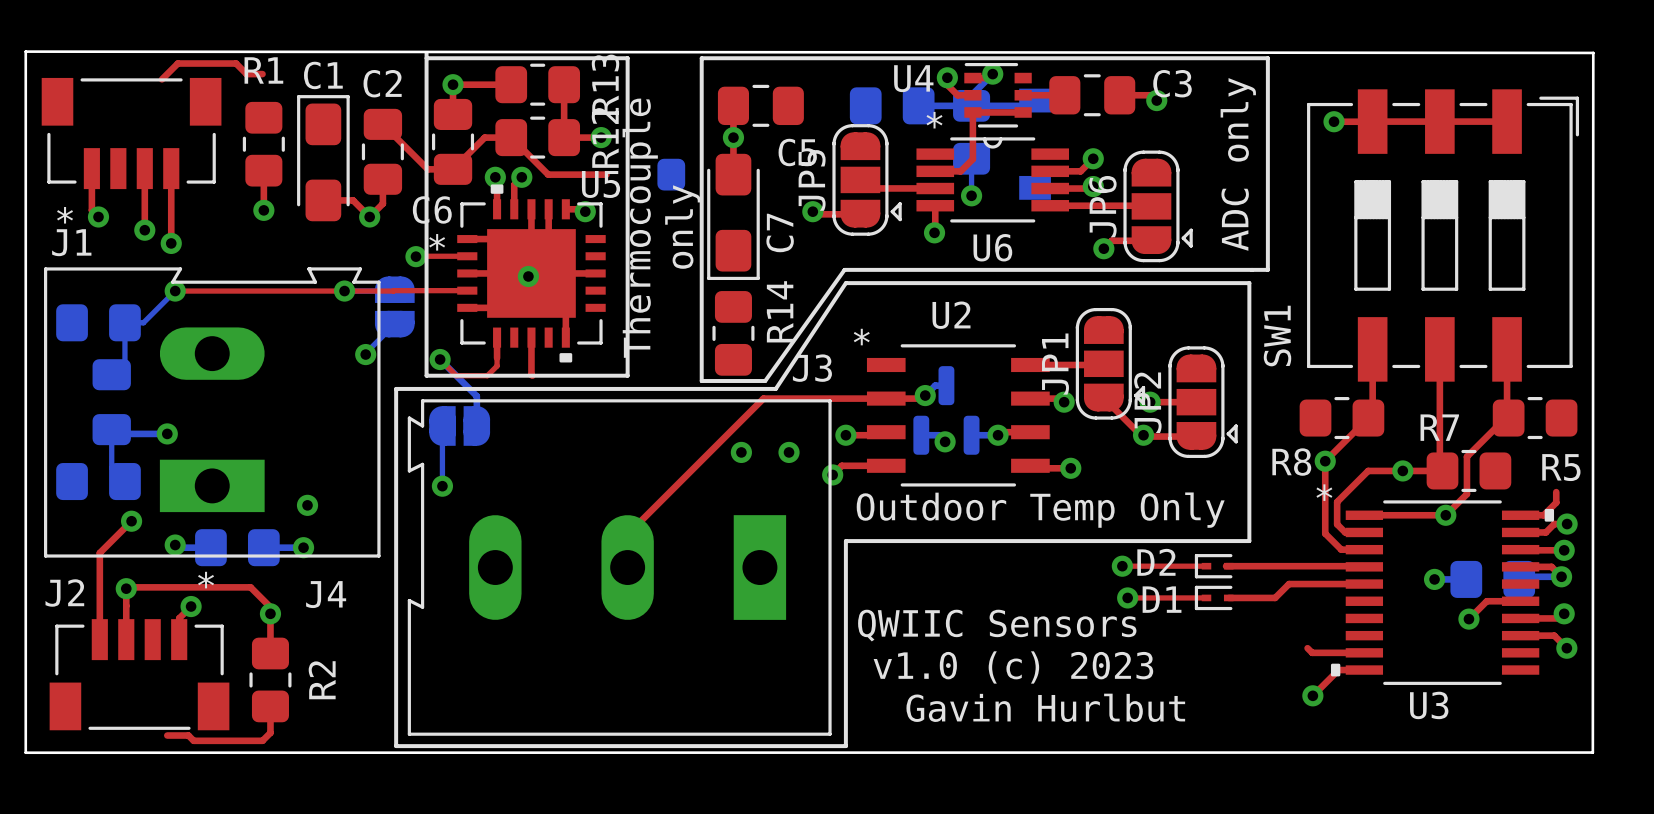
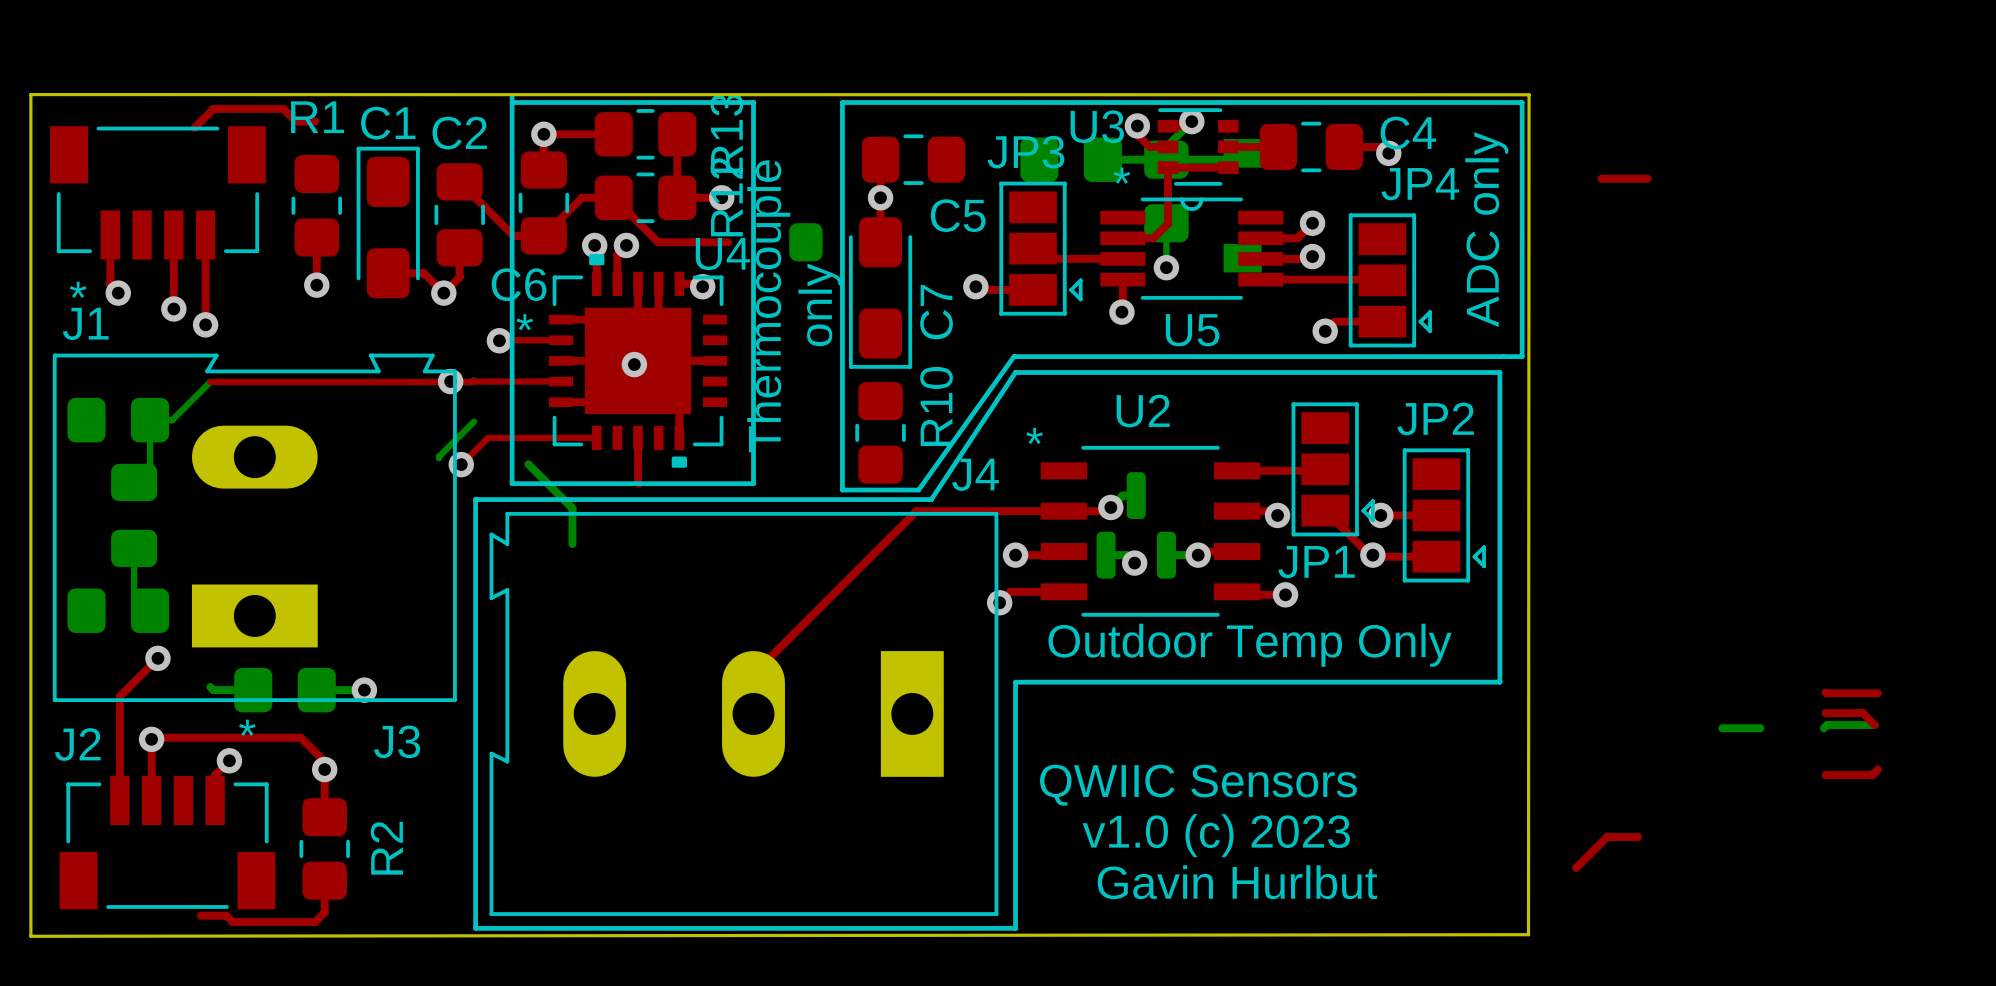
board edge: (25, 51) (1593, 52) (1592, 752) (25, 752) -> (30, 94) (1529, 94) (1528, 934) (30, 936)
U4 name: U4 (913, 78) -> U3 (1097, 126)
C3 name: C3 (1172, 83) -> C4 (1408, 133)
via: (1334, 121) -> none
top track: (1372, 121) (1507, 121) -> none
JP5: (867, 179) -> none
JP3: none -> (1040, 248)
U5 name: U5 (601, 184) -> U4 (722, 254)
JP6: (1158, 206) -> none
JP4: none -> (1390, 280)
SW1: (1443, 235) -> none
U6 name: U6 (992, 247) -> U5 (1192, 330)
via: (175, 291) -> none
via position: (344, 291) -> (450, 381)
part: (394, 306) -> none
JP1 footprint: [1075, 307, 1146, 420] -> [1291, 402, 1375, 537]
R14 name: R14 (780, 311) -> R10 (936, 406)
top track: (497, 337) (497, 366) (487, 375) (456, 375) (440, 359) -> (596, 437) (487, 437) (461, 464)
JP2 footprint: [1168, 346, 1238, 458] -> [1402, 448, 1486, 583]
top track: (1372, 349) (1372, 413) (1325, 461) (1325, 533) (1341, 549) (1364, 549) -> none
top track: (1439, 349) (1439, 468) (1442, 470) (1368, 470) (1337, 501) (1337, 524) (1345, 532) (1364, 532) -> none
top track: (1507, 349) (1507, 416) (1508, 418) (1505, 418) (1466, 456) (1466, 494) (1445, 515) (1364, 515) -> none
via position: (365, 354) -> (461, 464)
via: (440, 359) -> none
JP1 name rotation: 0° (1055, 364) -> 90° clockwise (1316, 562)
JP1 name position: JP1 (1055, 364) -> JP1 (1316, 562)
J3 name: J3 (812, 368) -> J4 (975, 474)
JP2 name rotation: 0° (1147, 402) -> 90° clockwise (1435, 418)
JP2 name position: JP2 (1147, 402) -> JP2 (1435, 418)
R8: (1341, 418) -> none
R5: (1535, 418) -> none
bottom track: (442, 425) (442, 486) -> none
part: (459, 425) -> none
bottom track: (111, 429) (116, 433) (167, 433) -> none
via: (167, 433) -> none
via: (741, 452) -> none
via: (789, 452) -> none
via: (1325, 461) -> none
via: (1402, 470) -> none
R7: (1468, 470) -> none
via: (442, 486) -> none
top track: (1556, 492) (1556, 502) (1543, 515) (1520, 515) -> none
via: (307, 505) -> none
via: (1445, 515) -> none
top track: (1567, 524) (1554, 524) (1545, 532) (1520, 532) -> none
via: (1567, 524) -> none
via: (175, 545) -> none
via: (1564, 550) -> none
top track: (1122, 566) (1206, 566) -> none
via: (1122, 566) -> none
D2: (1214, 566) -> none
top track: (1226, 566) (1364, 566) -> none
via: (1561, 576) -> none
via: (1434, 579) -> none
part: (1492, 579) -> none
top track: (1364, 584) (1289, 584) (1275, 597) (1228, 597) -> none
U3: (1442, 592) -> none
J4 name: J4 (326, 594) -> J3 (397, 741)
top track: (1127, 597) (1206, 597) -> none
via: (1127, 597) -> none
D1: (1214, 597) -> none
top track: (1520, 601) (1486, 601) (1468, 619) -> none
via: (1564, 613) -> none
via: (1468, 619) -> none
top track: (1520, 635) (1554, 635) (1566, 648) -> none
top track: (1307, 648) (1312, 652) (1364, 652) -> none
via: (1566, 648) -> none
via: (1312, 695) -> none

